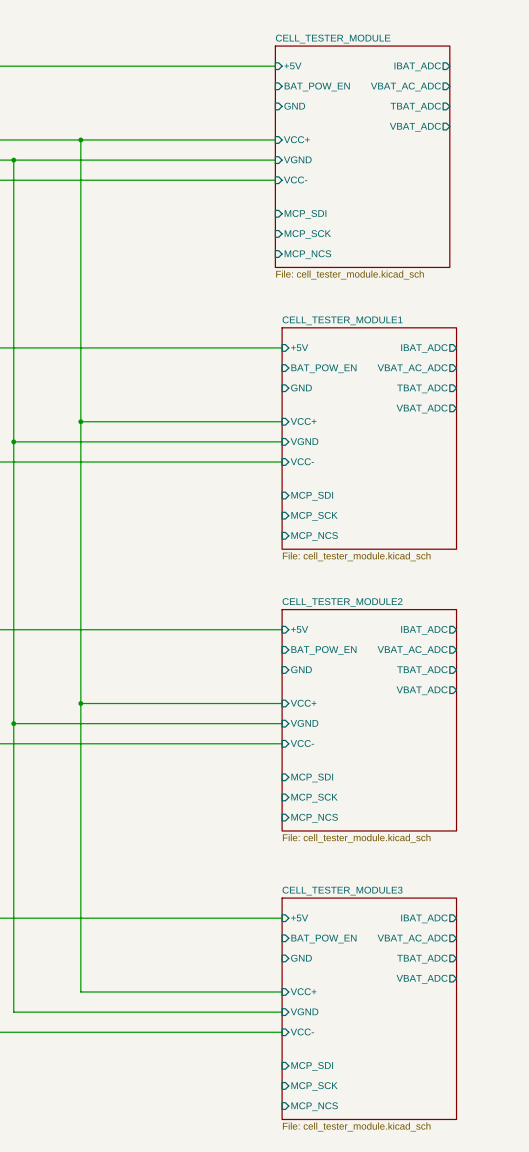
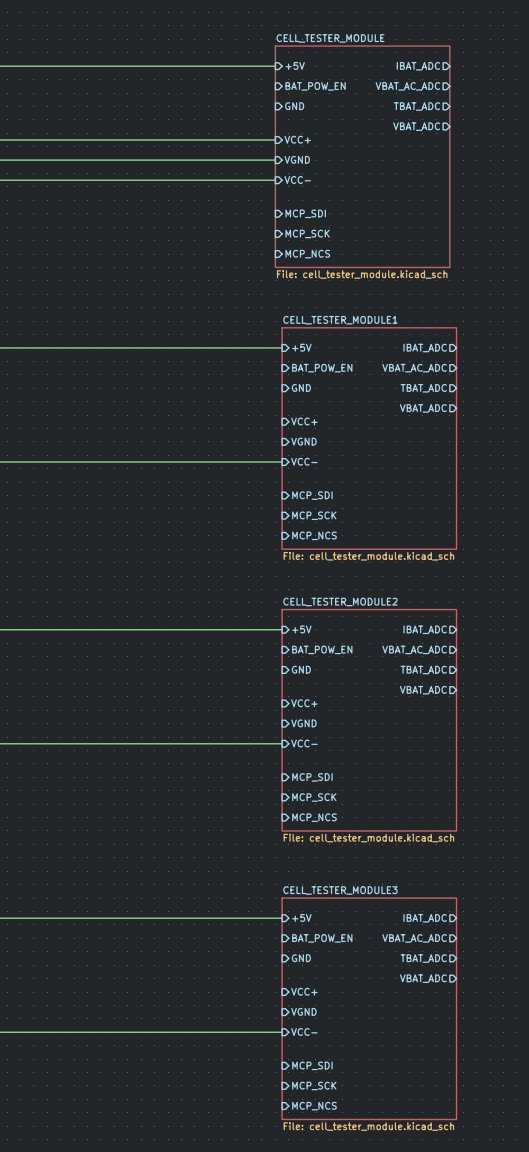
wire: (80, 139) (80, 992) (282, 992) -> none
junction: (80, 139) -> none
wire: (13, 160) (13, 1012) (282, 1012) -> none
junction: (13, 160) -> none
wire: (80, 421) (282, 421) -> none
junction: (80, 421) -> none
wire: (13, 441) (282, 441) -> none
junction: (13, 441) -> none
wire: (80, 703) (282, 703) -> none
junction: (80, 703) -> none
wire: (13, 723) (282, 723) -> none
junction: (13, 723) -> none

